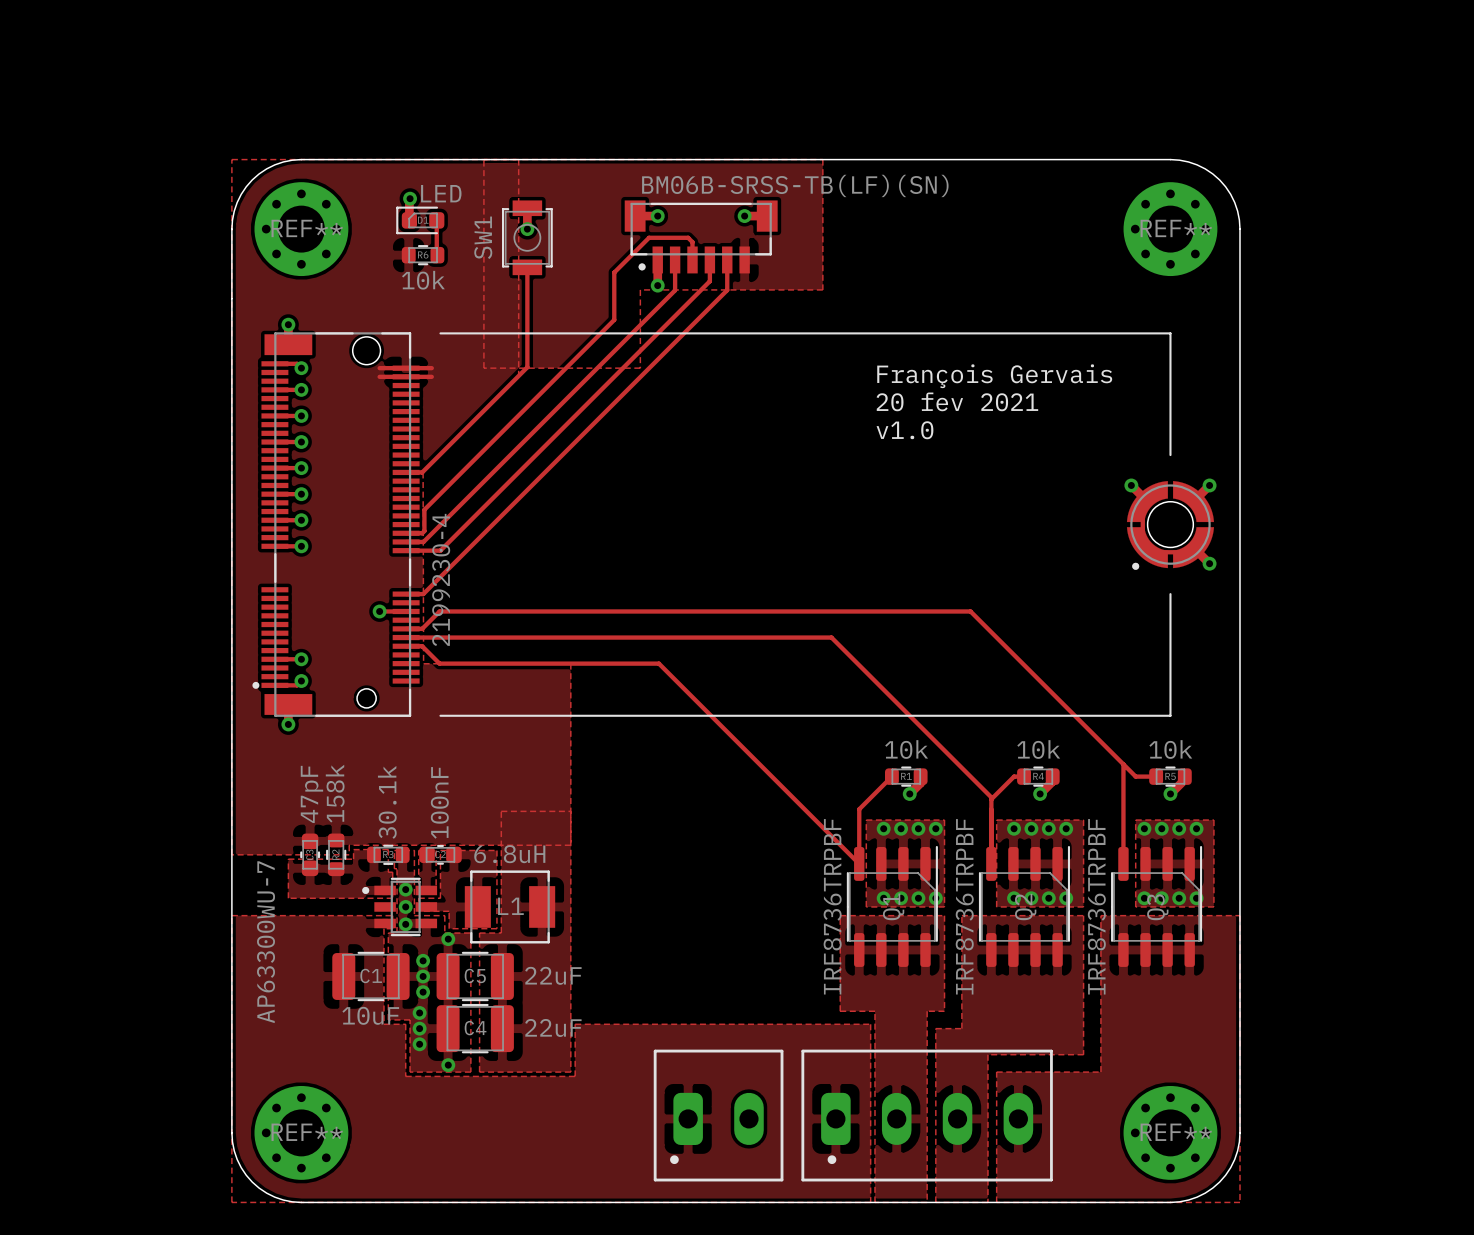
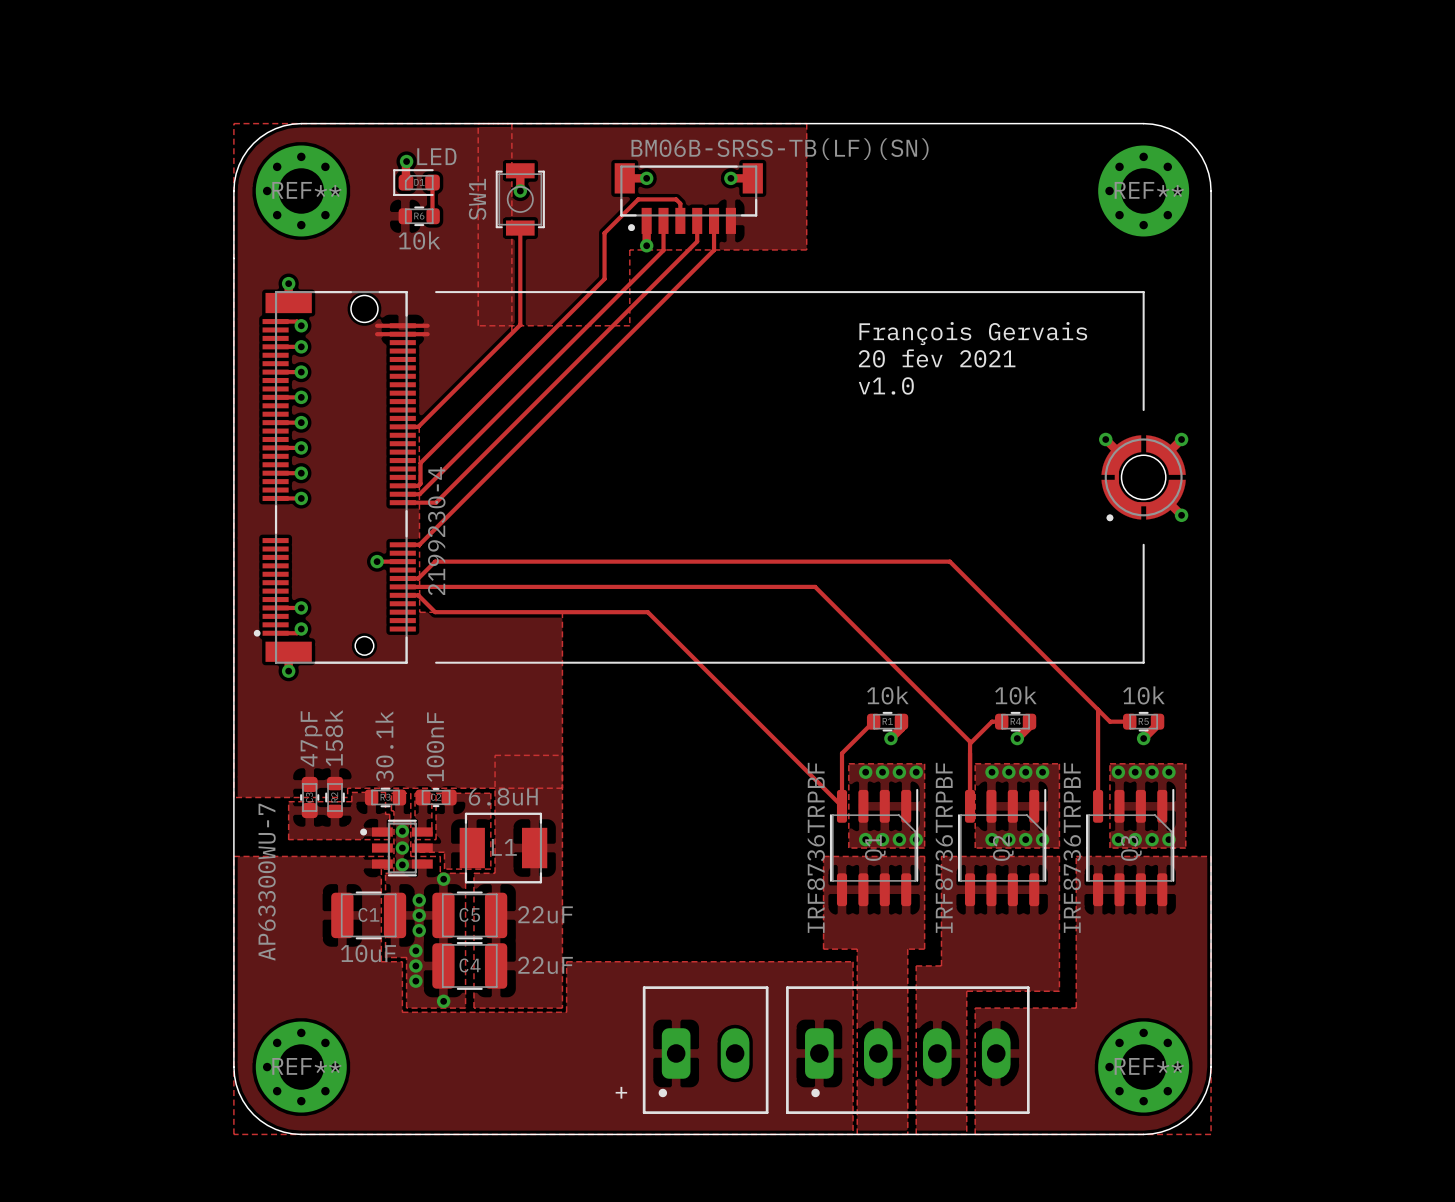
text: none -> + (621, 1092)

